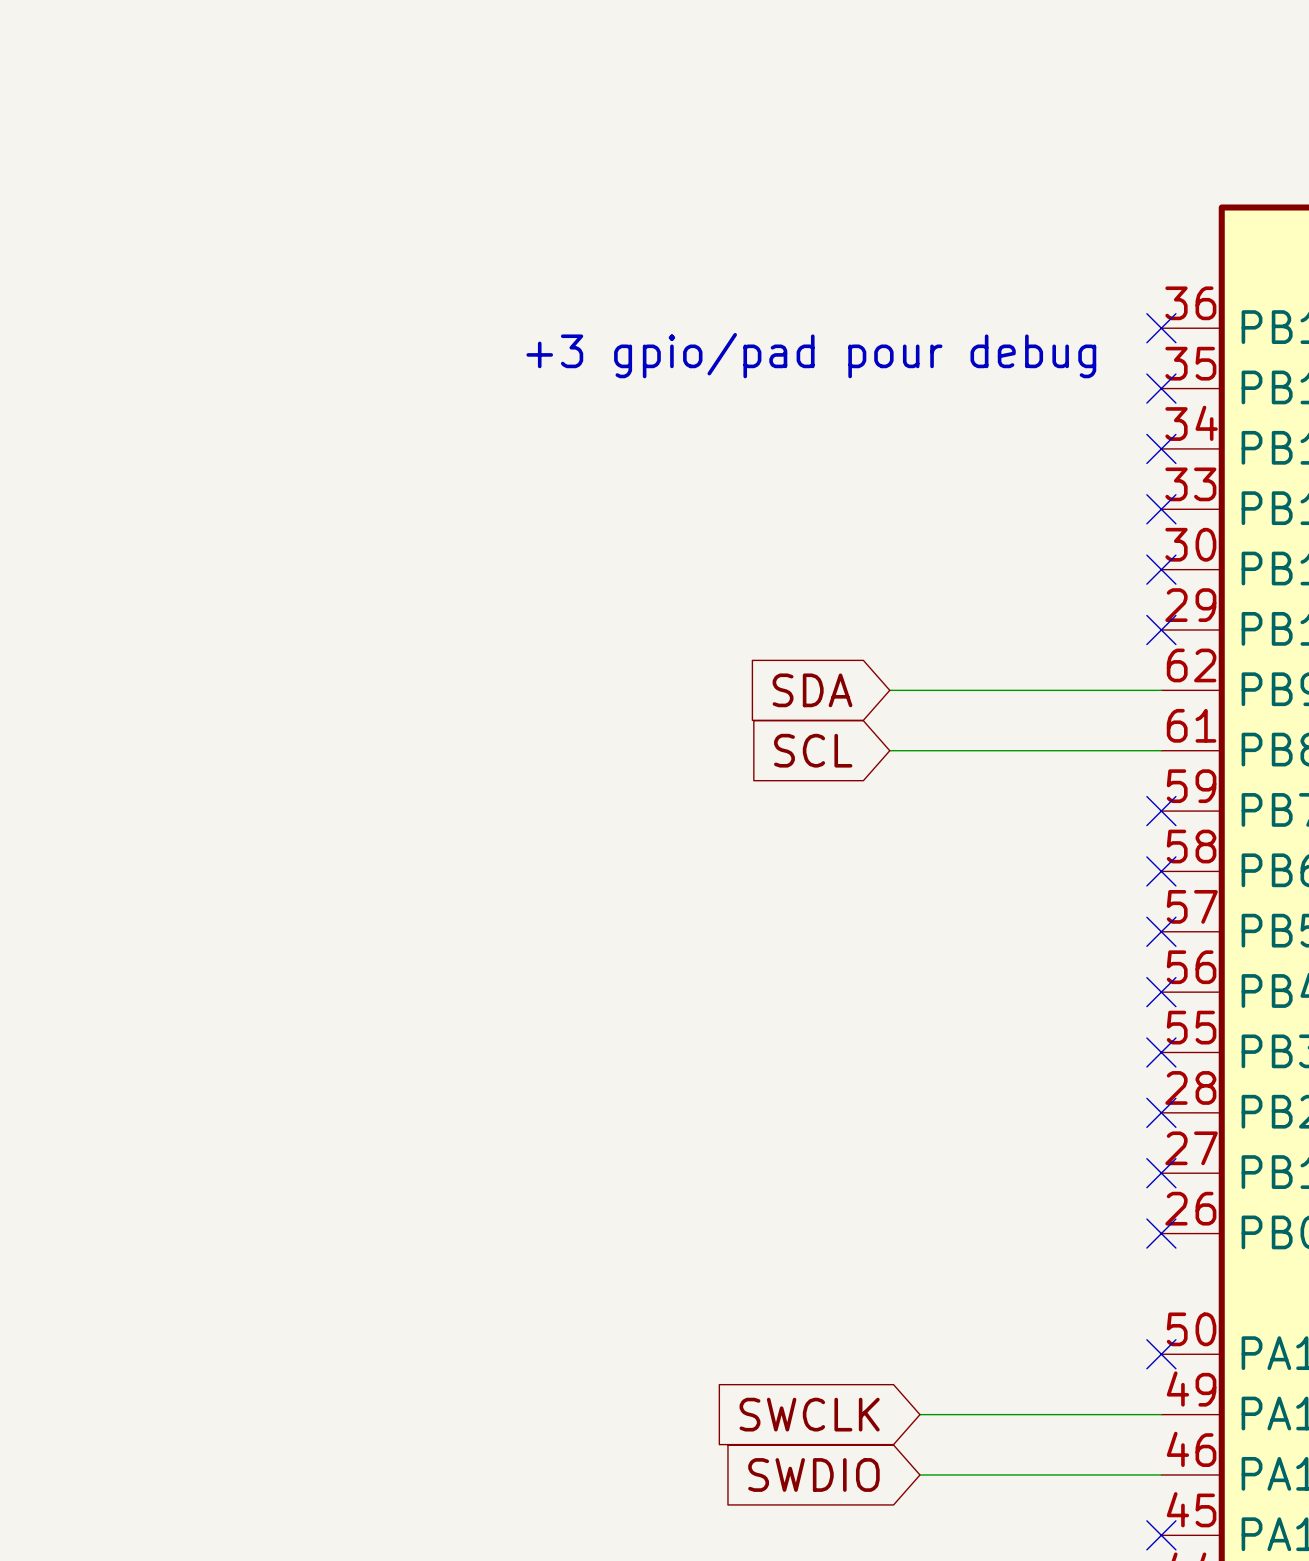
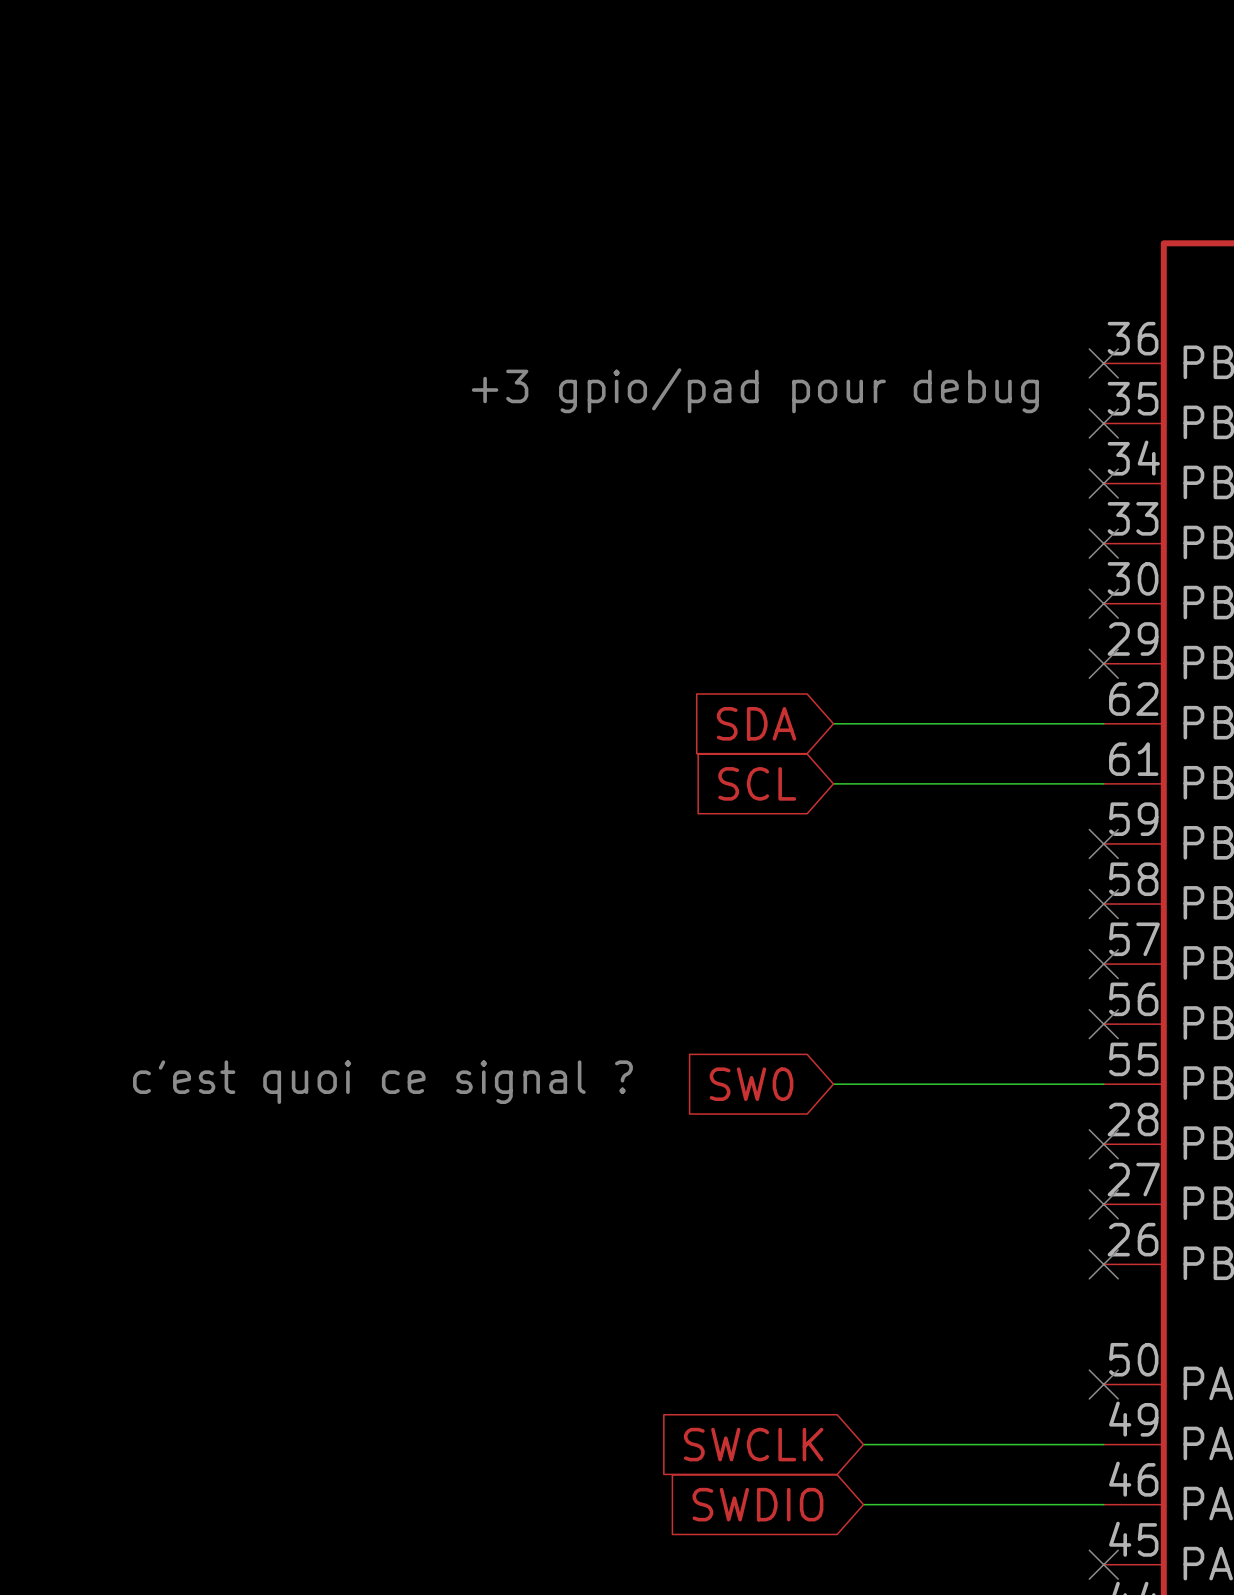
text: none -> c'est quoi ce signal ? (382, 1082)
global label: none -> SW0 (751, 1084)
wire: none -> (833, 1084) (1103, 1084)
no-connect mark: (1161, 1052) -> none

